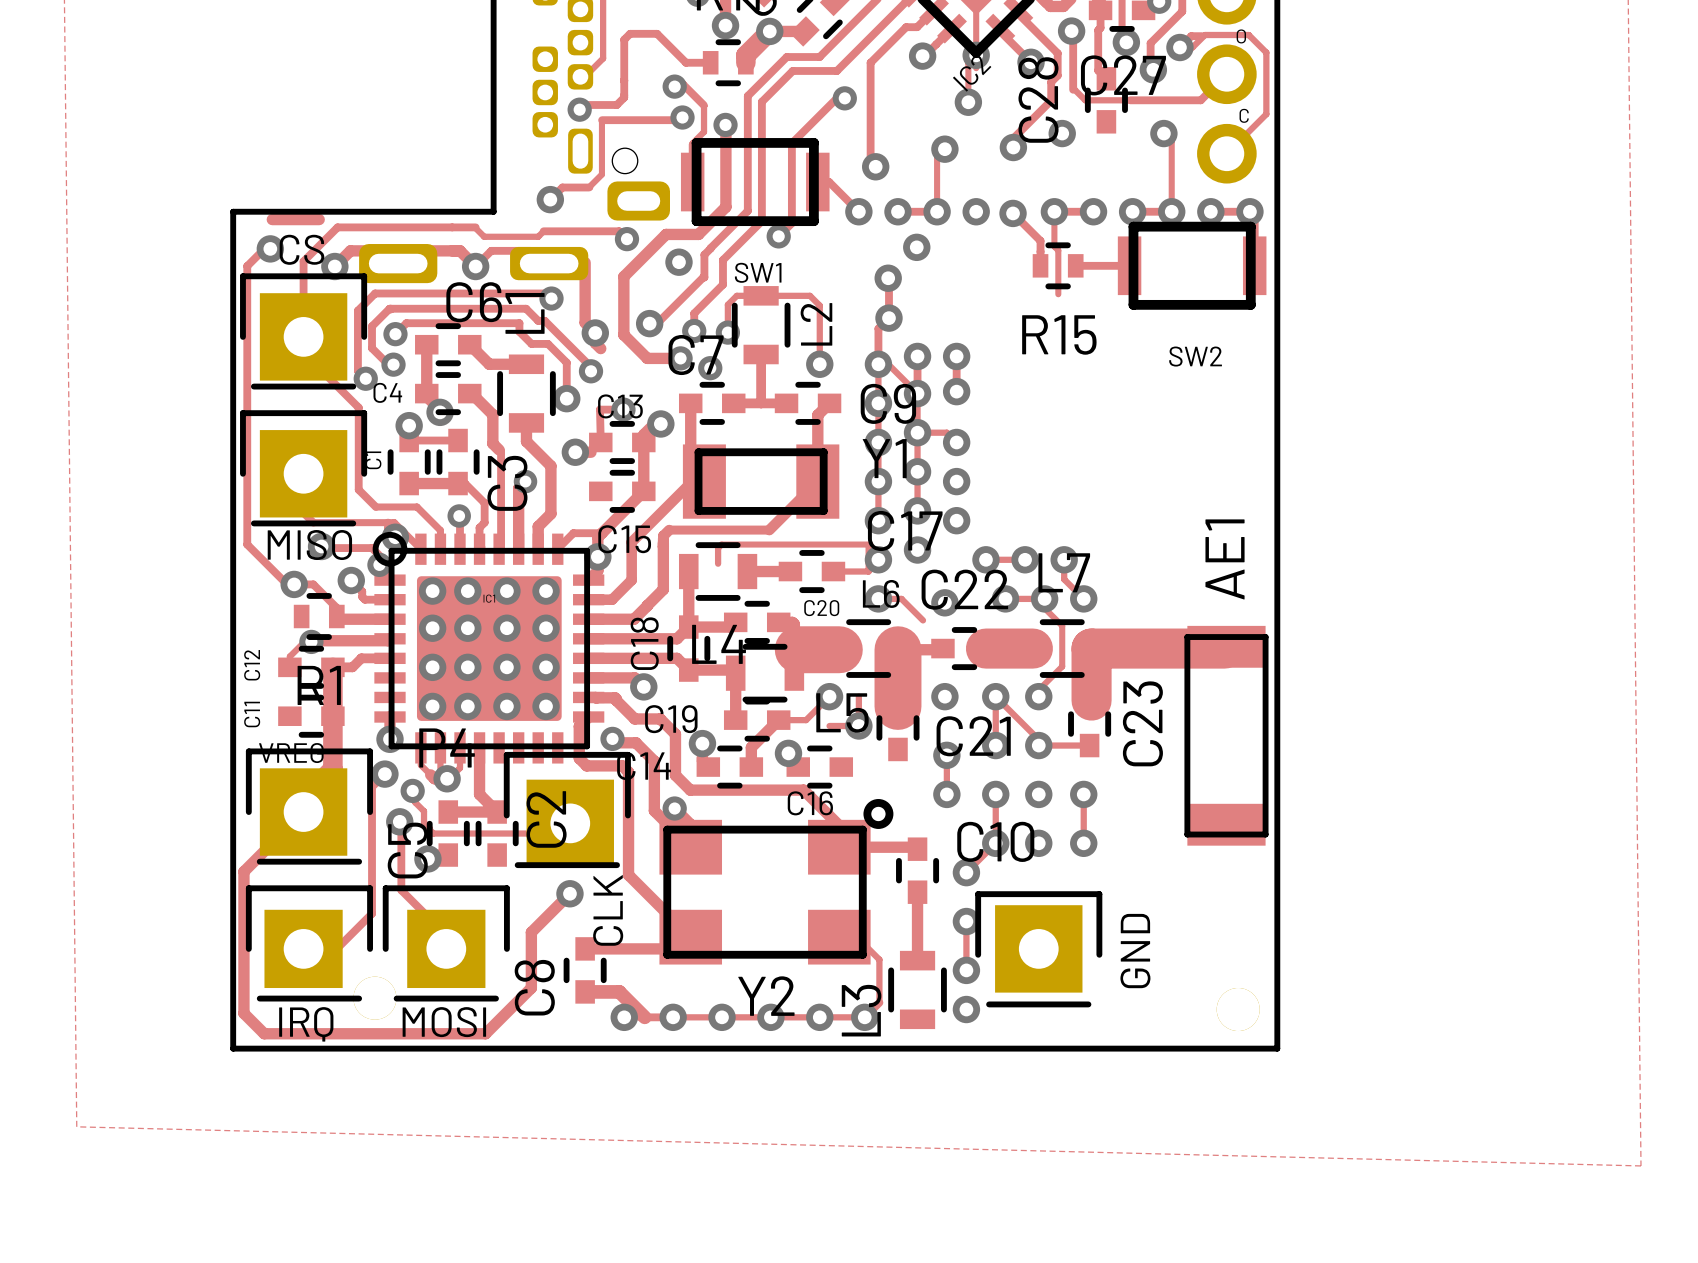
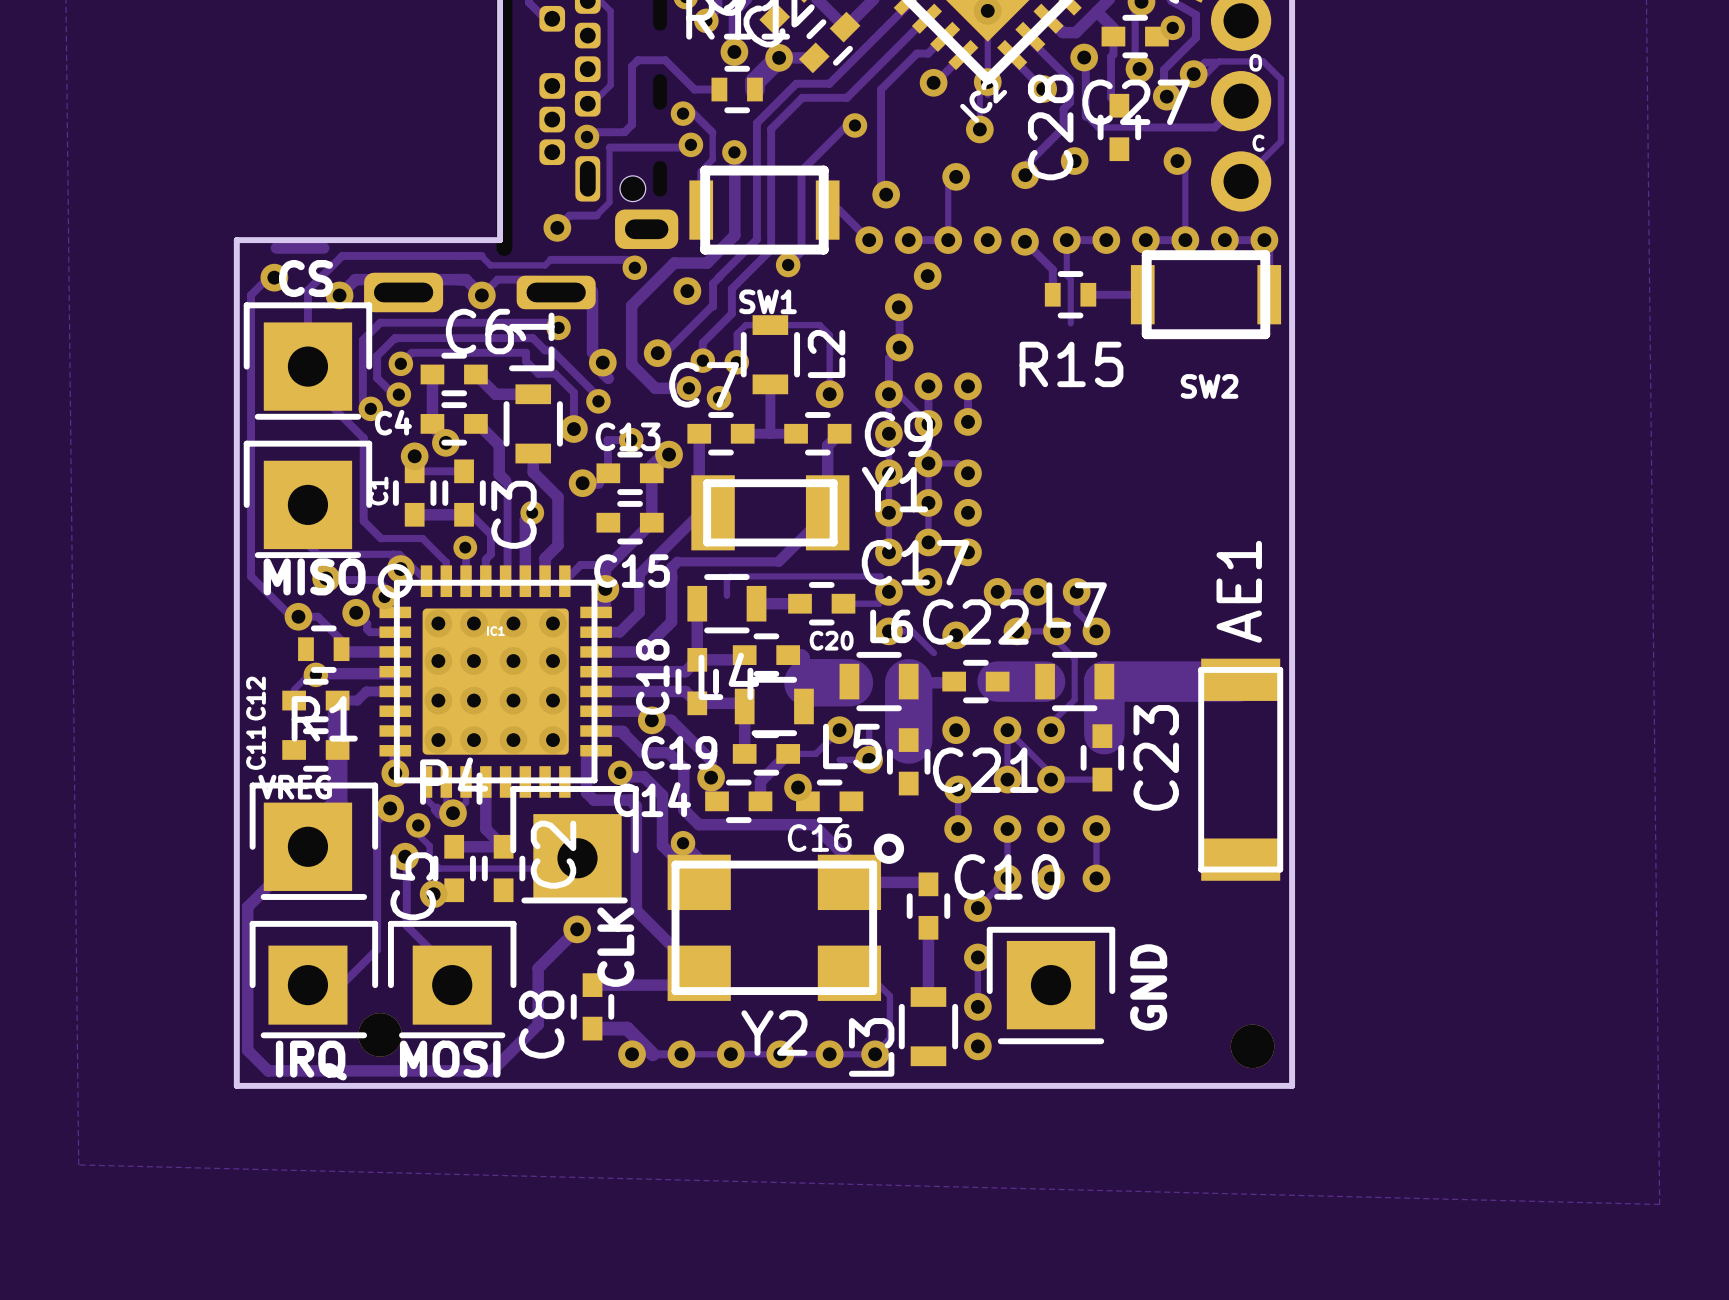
track: none -> (651, 720) (671, 720) (711, 760) (711, 777)

